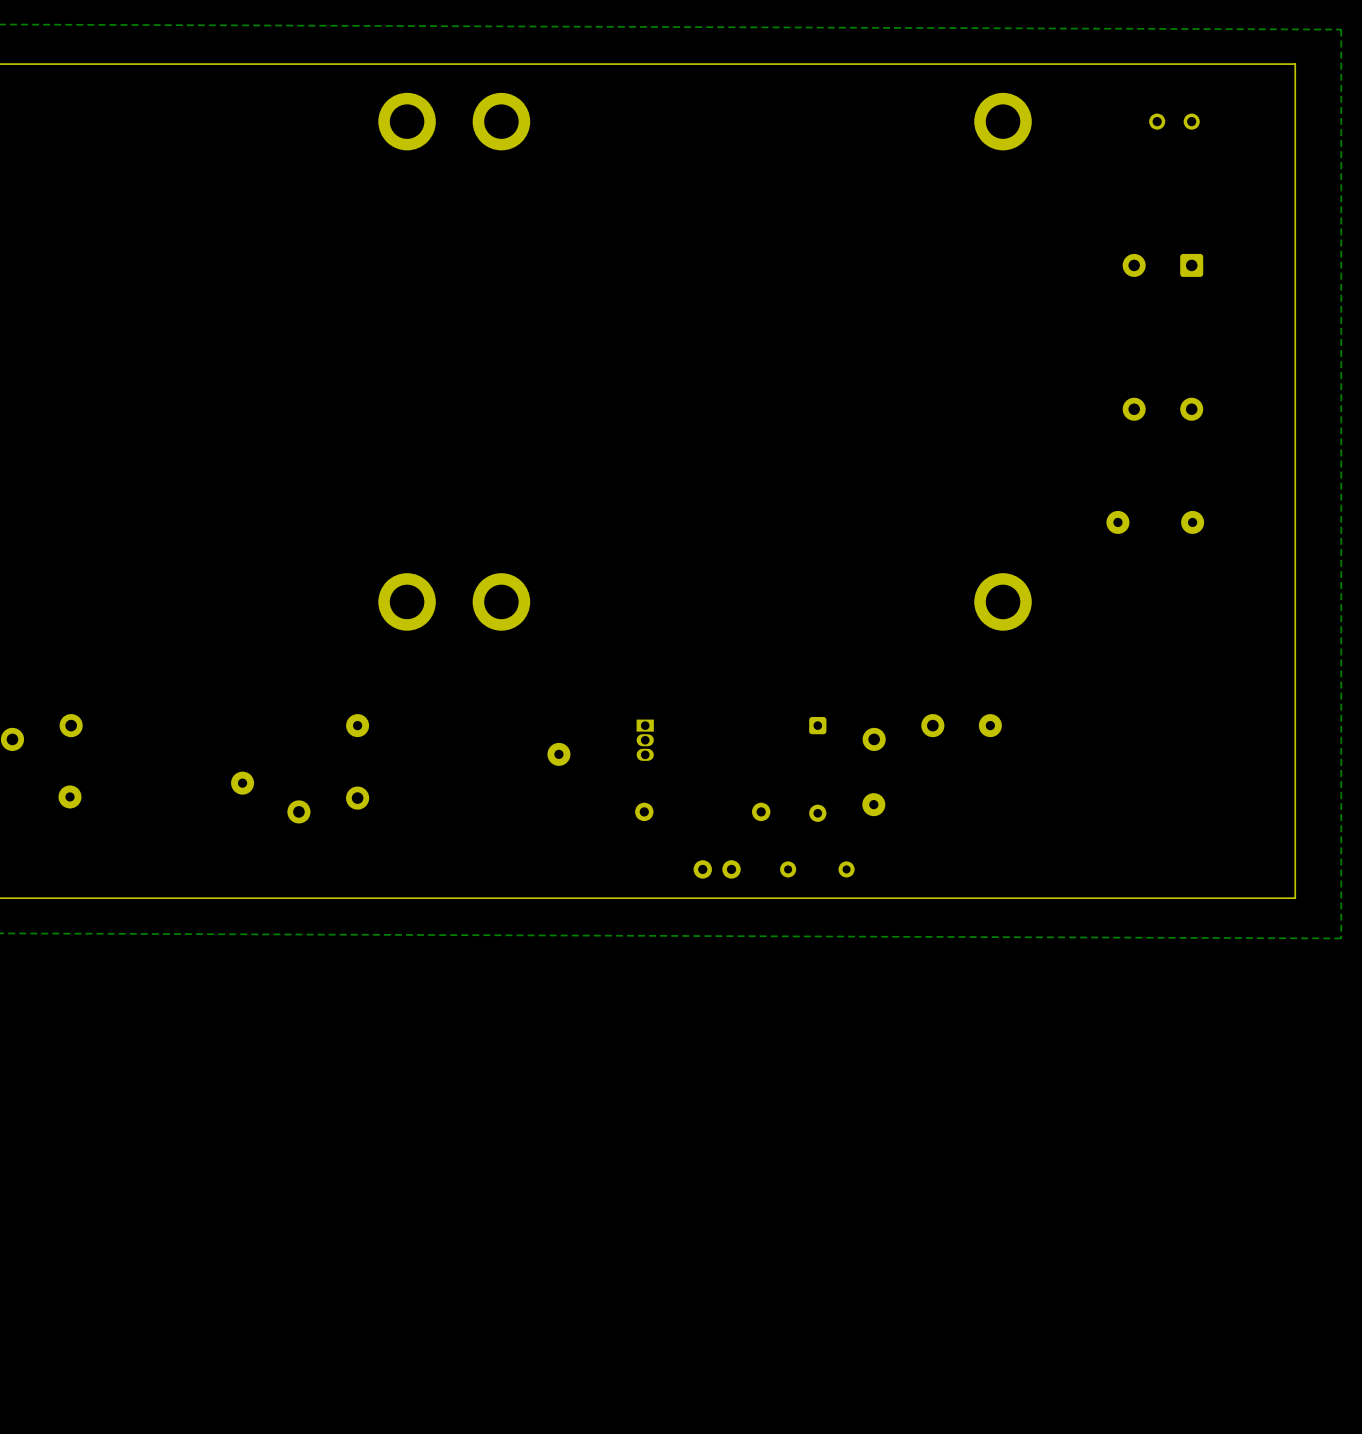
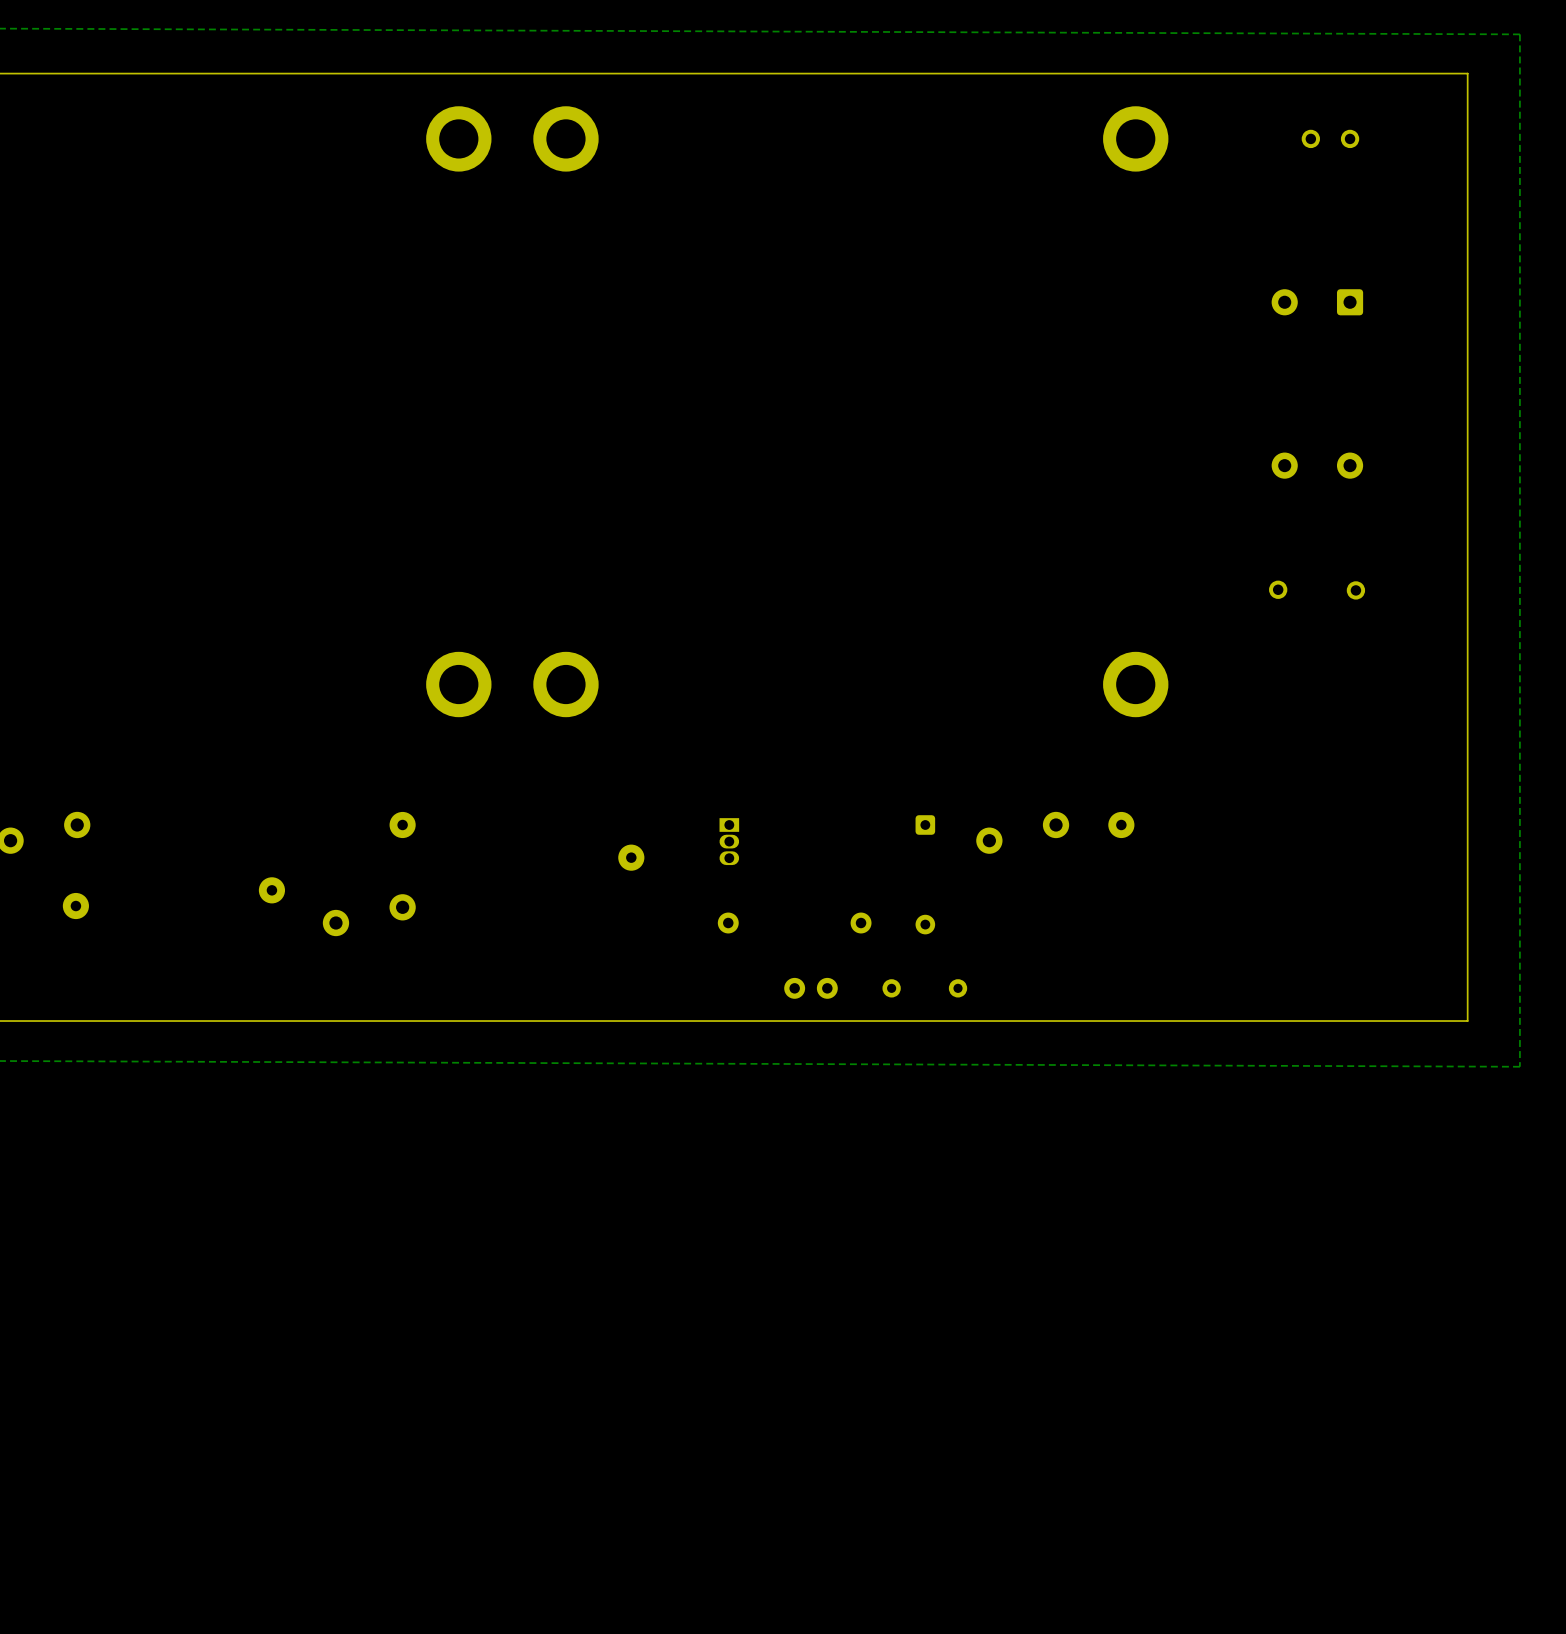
part footprint: [1106, 510, 1130, 534] -> [1269, 580, 1288, 599]
part footprint: [1181, 510, 1205, 534] -> [1346, 581, 1366, 600]
part: (873, 804) -> none

